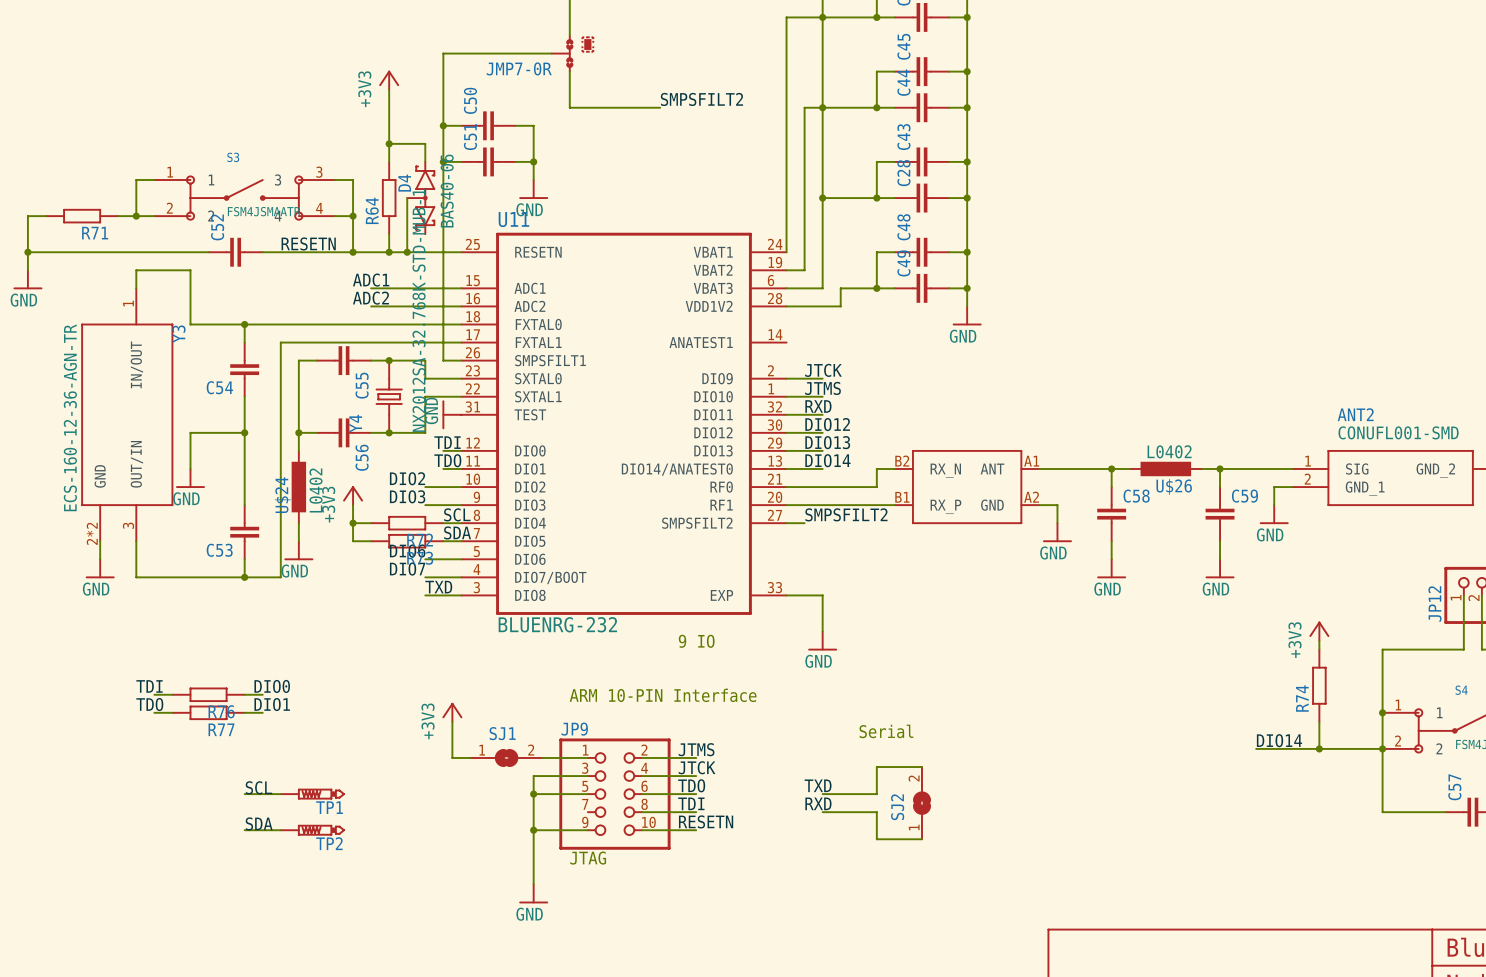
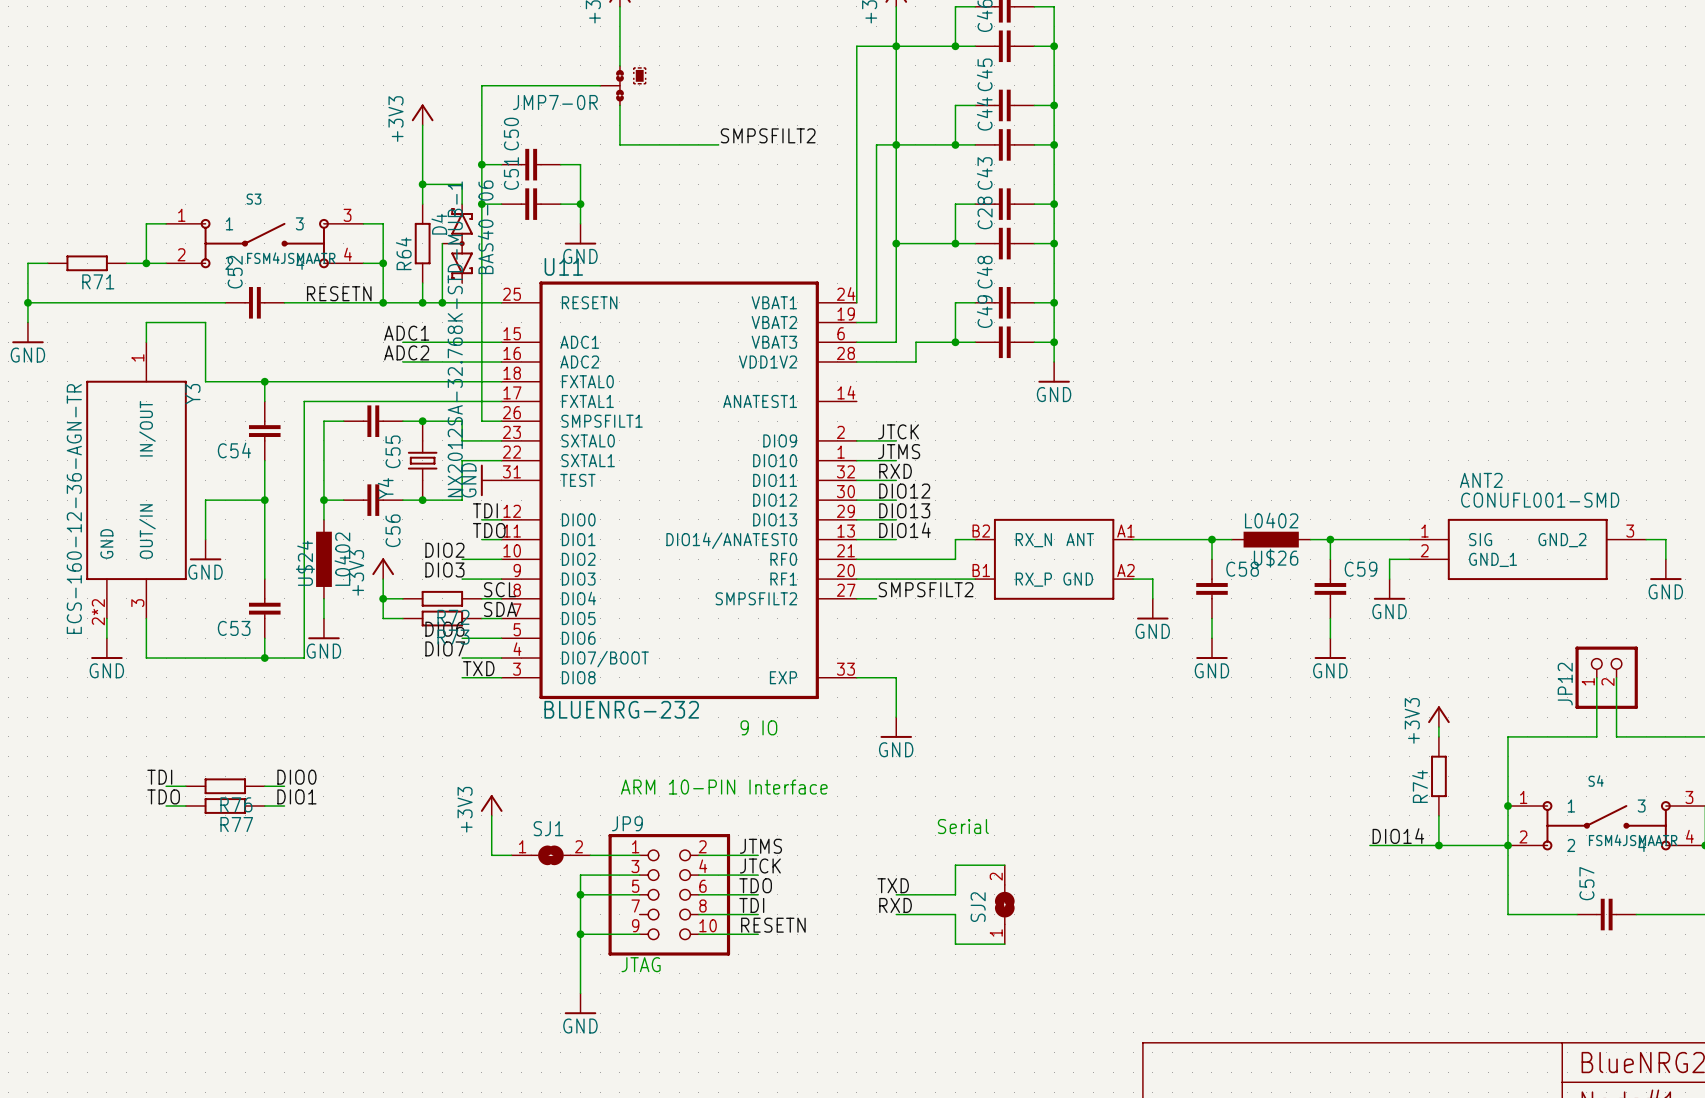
label: SCL (258, 787) -> none
wire: (244, 794) (280, 794) -> none
TP1: (312, 794) -> none
label: SDA (259, 823) -> none
wire: (244, 830) (280, 830) -> none
TP2: (312, 830) -> none

